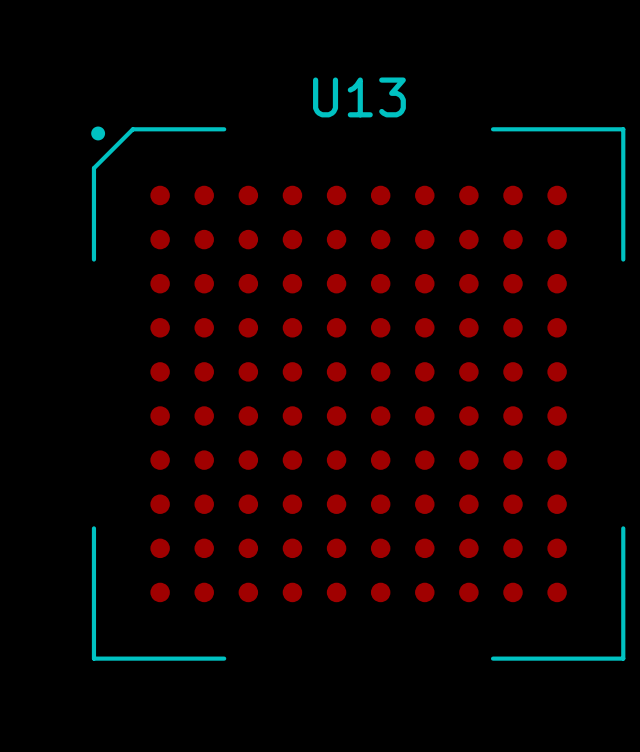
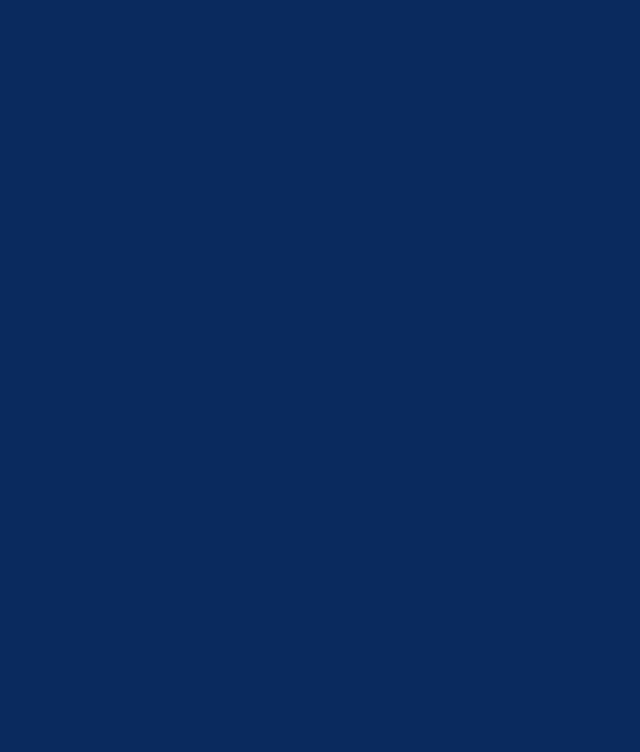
U13: (358, 393) -> none

